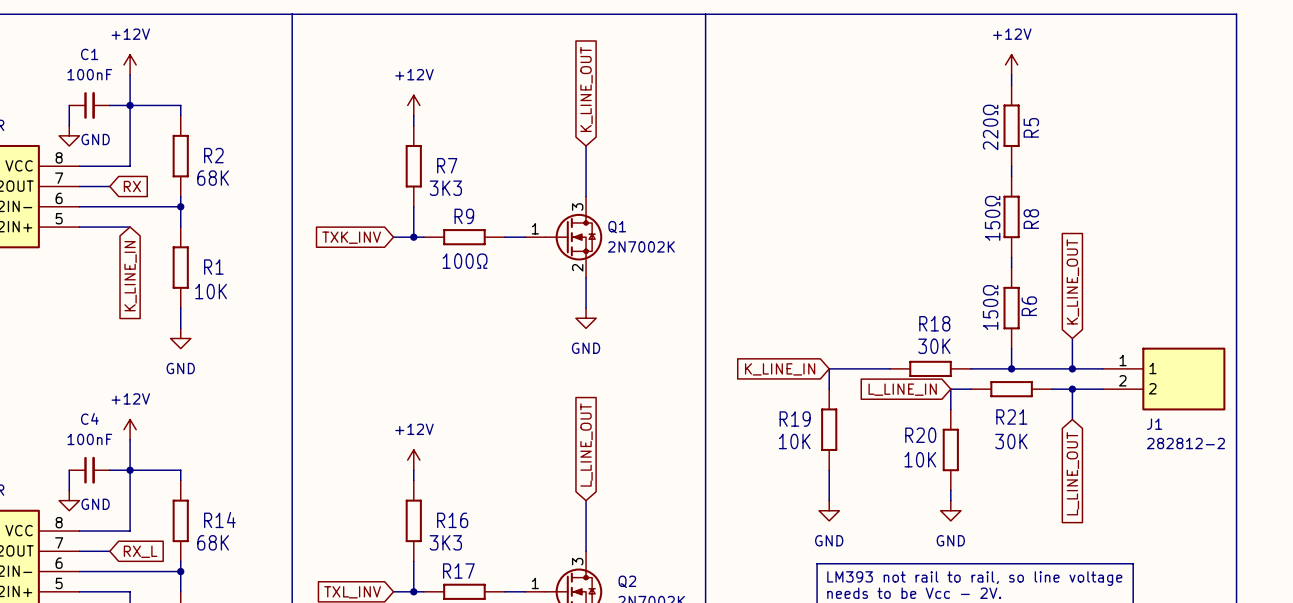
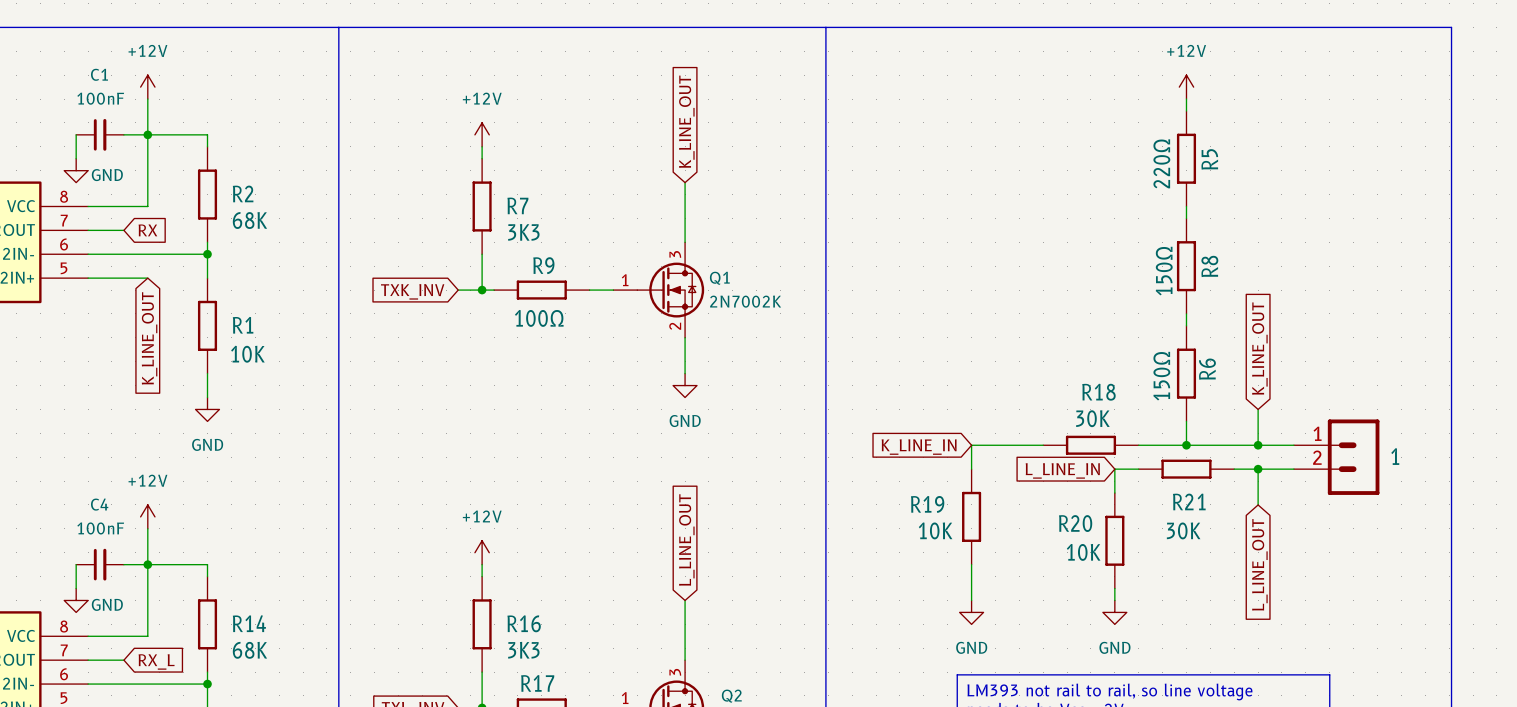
global label: K_LINE_IN (130, 276) -> K_LINE_OUT (149, 338)
1: none -> (1336, 457)
J1: 282812-2 (1164, 379) -> none

